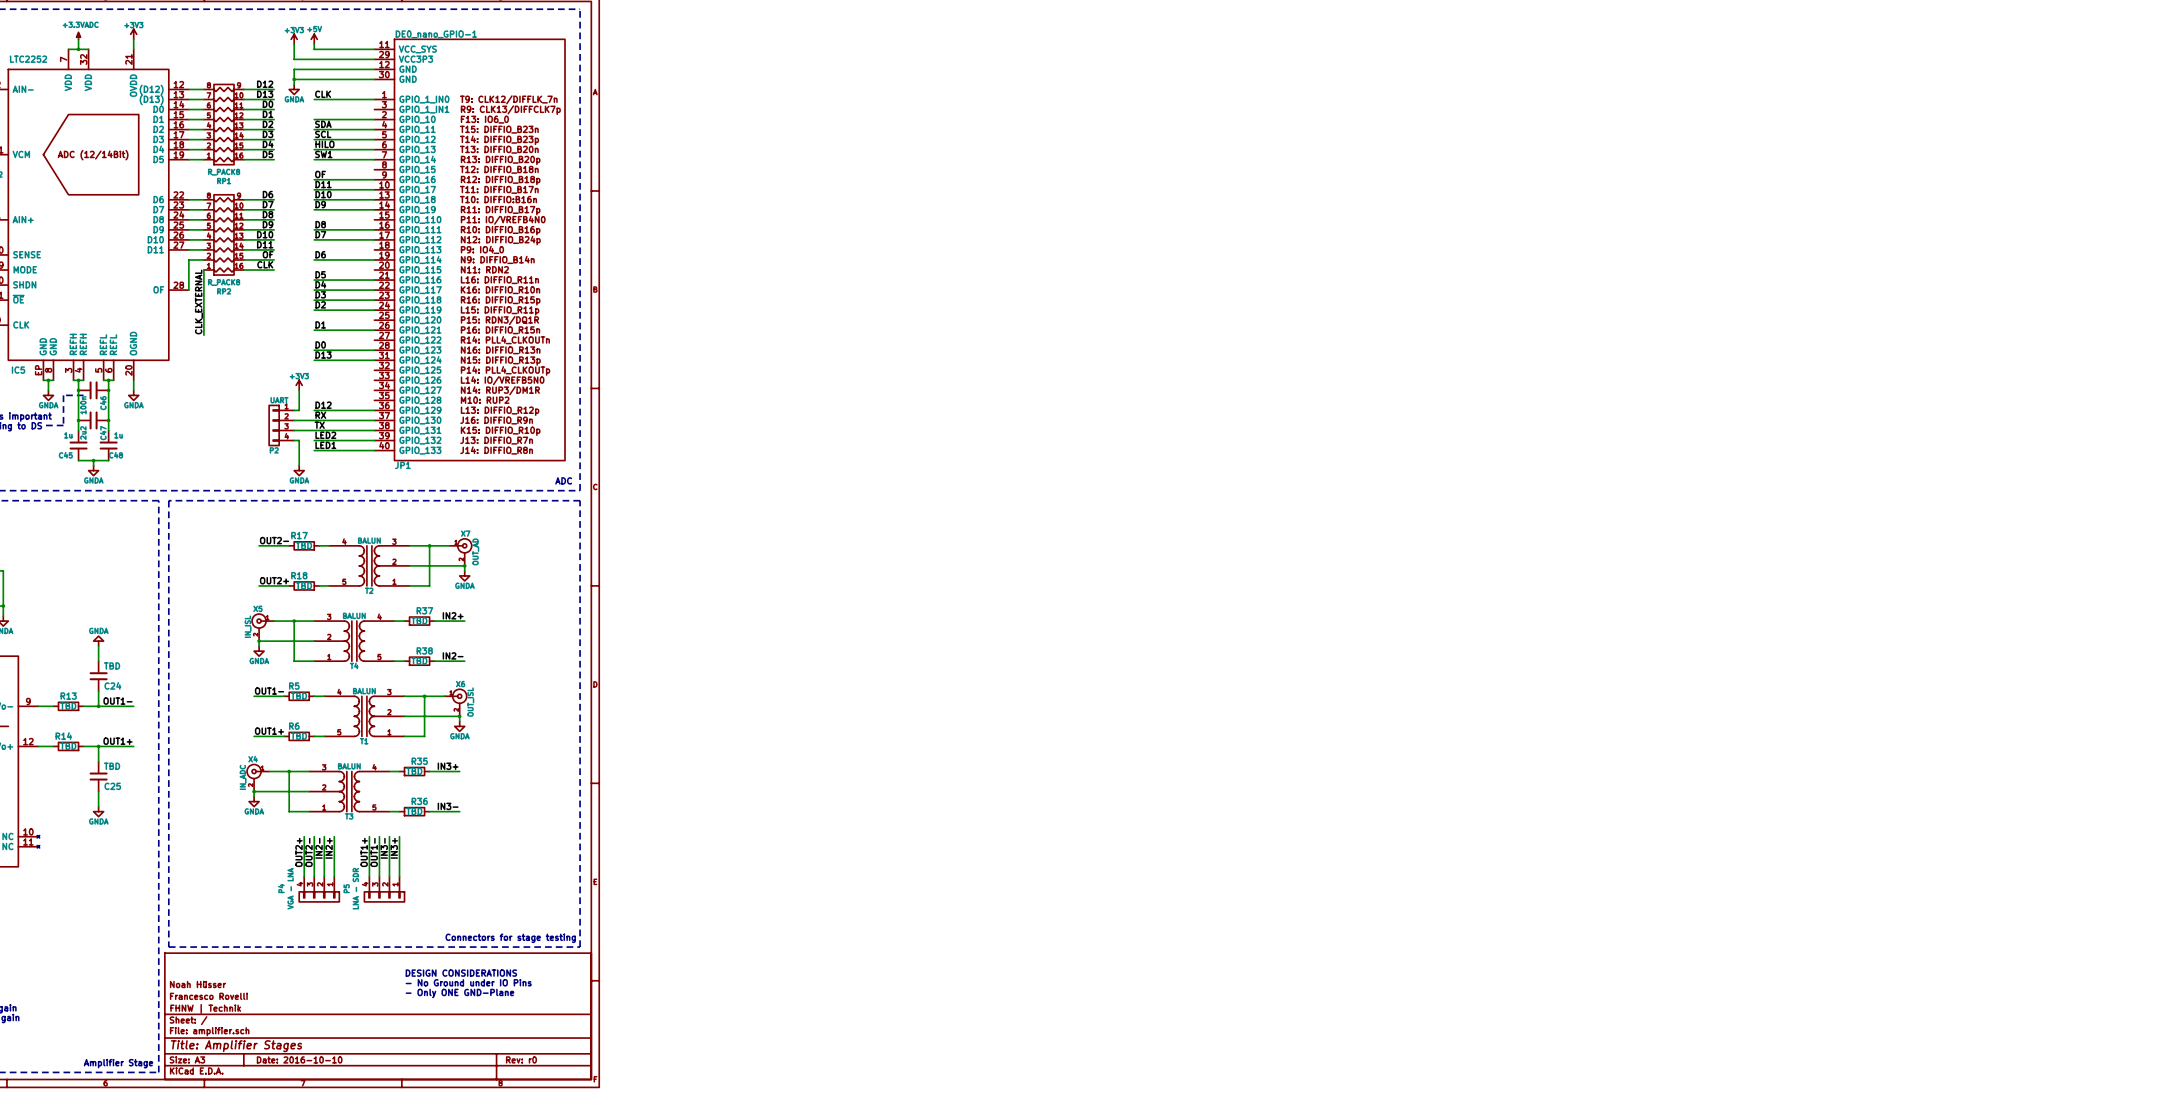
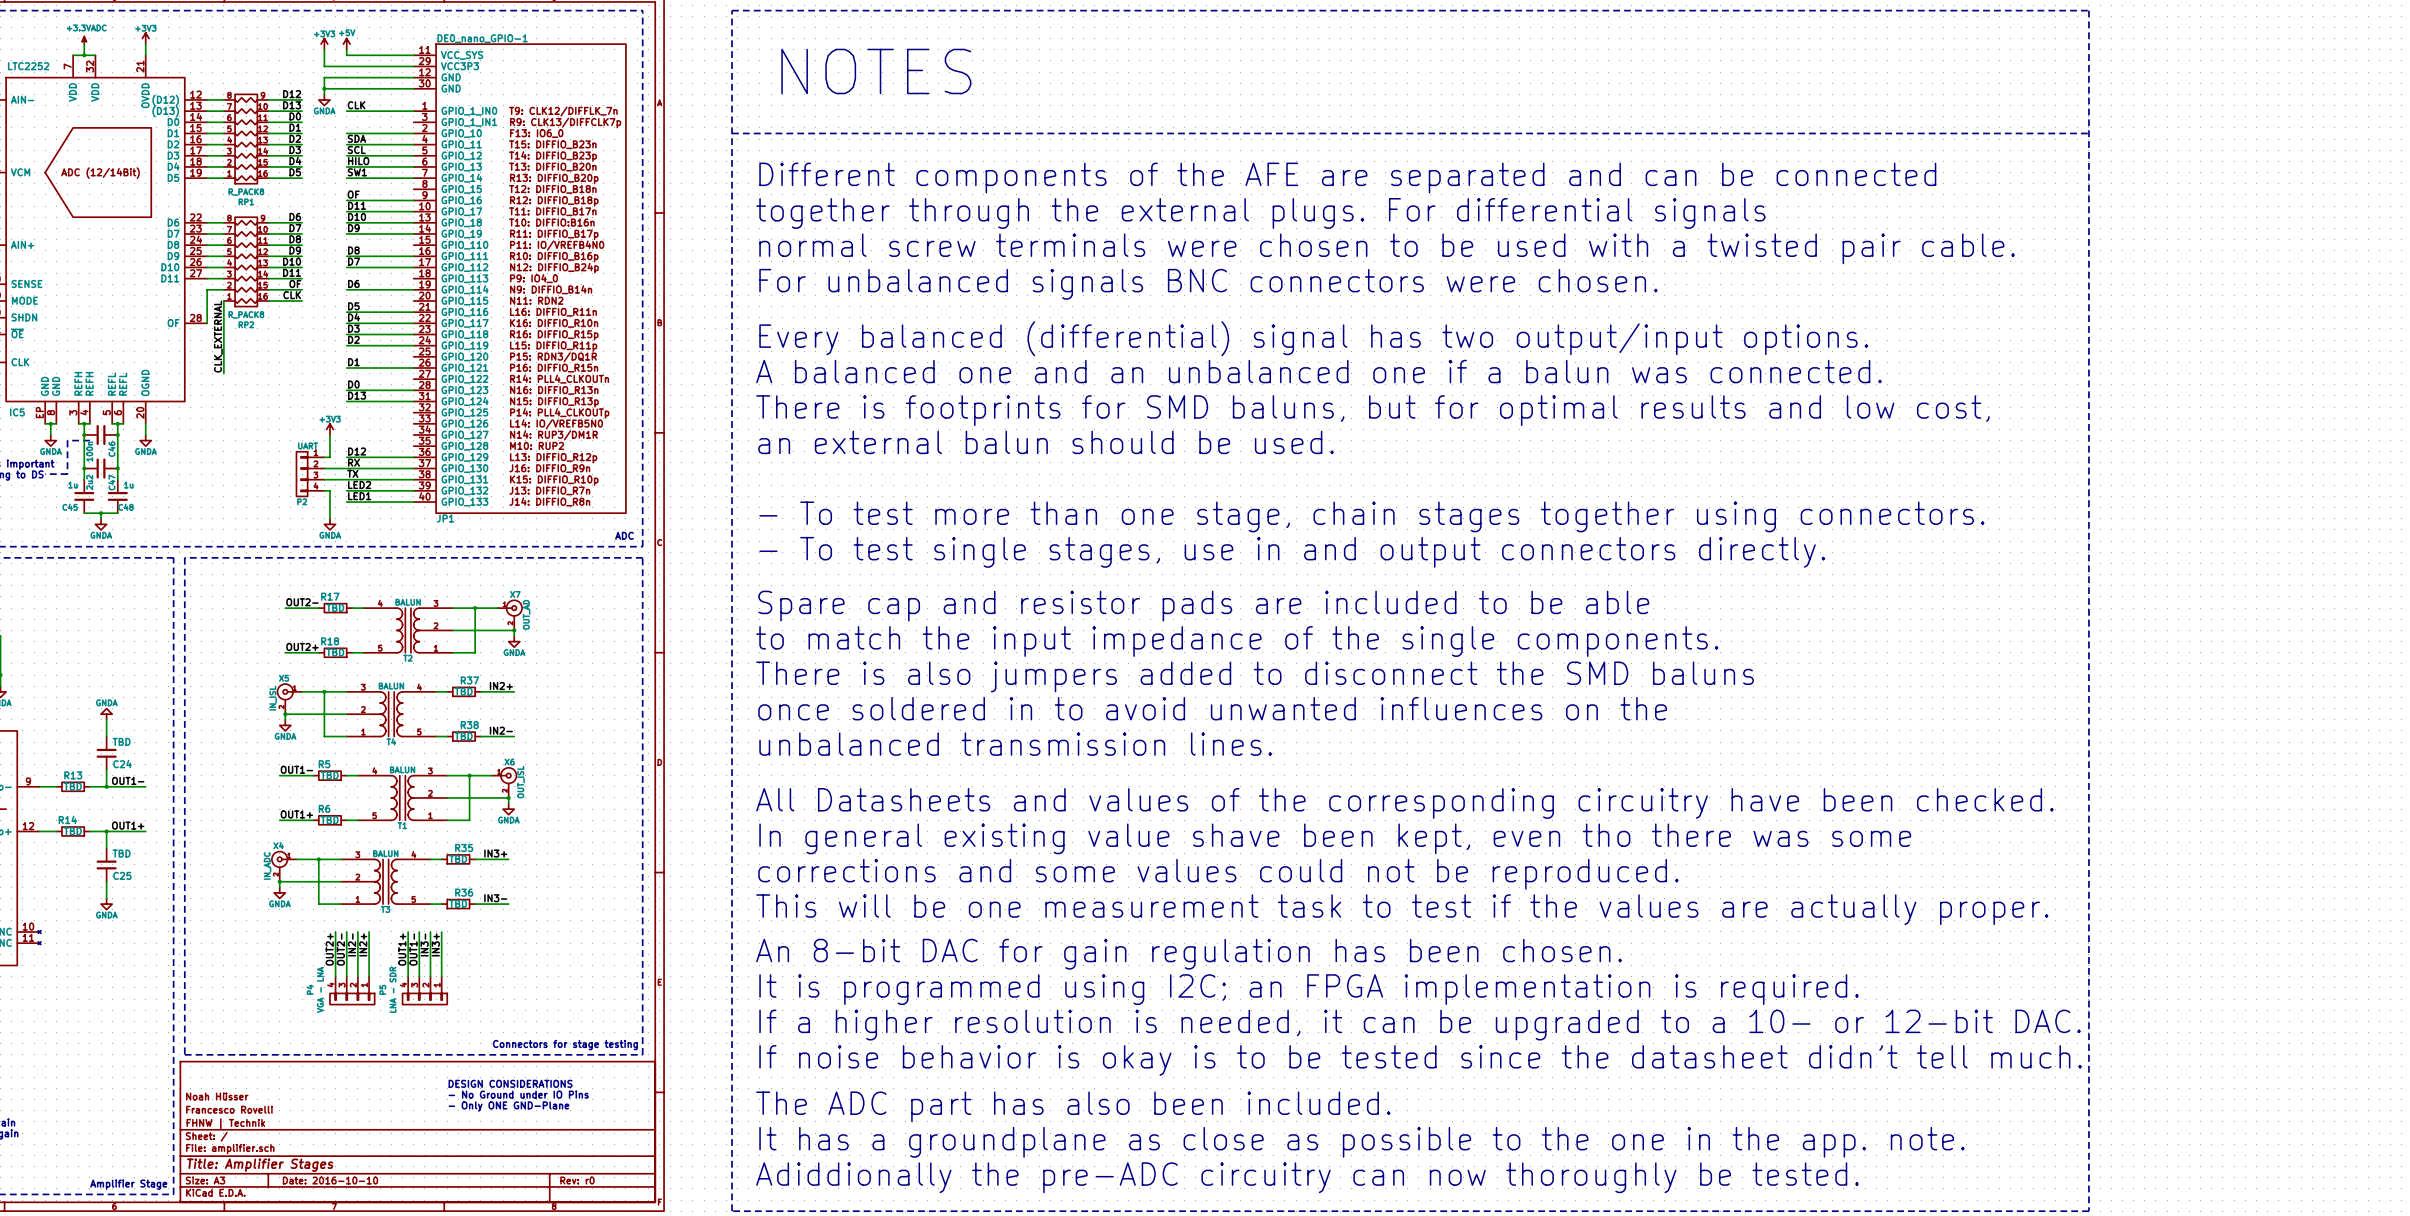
line: none -> (732, 10) (2088, 10) (2088, 1211) (732, 1211) (732, 10)
text: none -> NOTES (876, 71)
line: none -> (732, 133) (2088, 133)
text: none -> Different components of the AFE are separated and can be connected (1347, 178)
text: none -> together through the external plugs. For differential signals (1260, 213)
text: none -> normal screw terminals were chosen to be used with a twisted pair cable. (1387, 248)
text: none -> For unbalanced signals BNC connectors were chosen. (1208, 284)
text: none -> Every balanced (differential) signal has two output/input options. (1313, 338)
text: none -> A balanced one and an unbalanced one if a balun was connected. (1318, 371)
text: none -> There is footprints for SMD baluns, but for optimal results and low cost, (1372, 410)
text: none -> an external balun should be used. (1046, 442)
text: none -> - To test more than one stage, chain stages together using connectors. (1371, 516)
text: none -> - To test single stages, use in and output connectors directly. (1292, 552)
text: none -> Spare cap and resistor pads are included to be able (1203, 606)
text: none -> to match the input impedance of the single components. (1237, 641)
text: none -> There is also jumpers added to disconnect the SMD baluns (1255, 676)
text: none -> once soldered in to avoid unwanted influences on the (1212, 708)
text: none -> unbalanced transmission lines. (1015, 744)
text: none -> All Datasheets and values of the corresponding circuitry have been checked. (1404, 803)
text: none -> In general existing value shave been kept, even tho there was some (1335, 838)
text: none -> corrections and some values could not be reproduced. (1218, 874)
text: none -> This will be one measurement task to test if the values are actually proper. (1402, 909)
text: none -> An 8-bit DAC for gain regulation has been chosen. (1189, 954)
text: none -> It is programmed using I2C; an FPGA implementation is required. (1309, 989)
text: none -> If a higher resolution is needed, it can be upgraded to a 10- or 12-bit DAC. (1420, 1025)
text: none -> If noise behavior is okay is to be tested since the datasheet didn’t tell much. (1420, 1060)
text: none -> The ADC part has also been included. (1073, 1106)
text: none -> It has a groundplane as close as possible to the one in the app. note. (1361, 1142)
text: none -> Adiddionally the pre-ADC circuitry can now thoroughly be tested. (1307, 1177)

